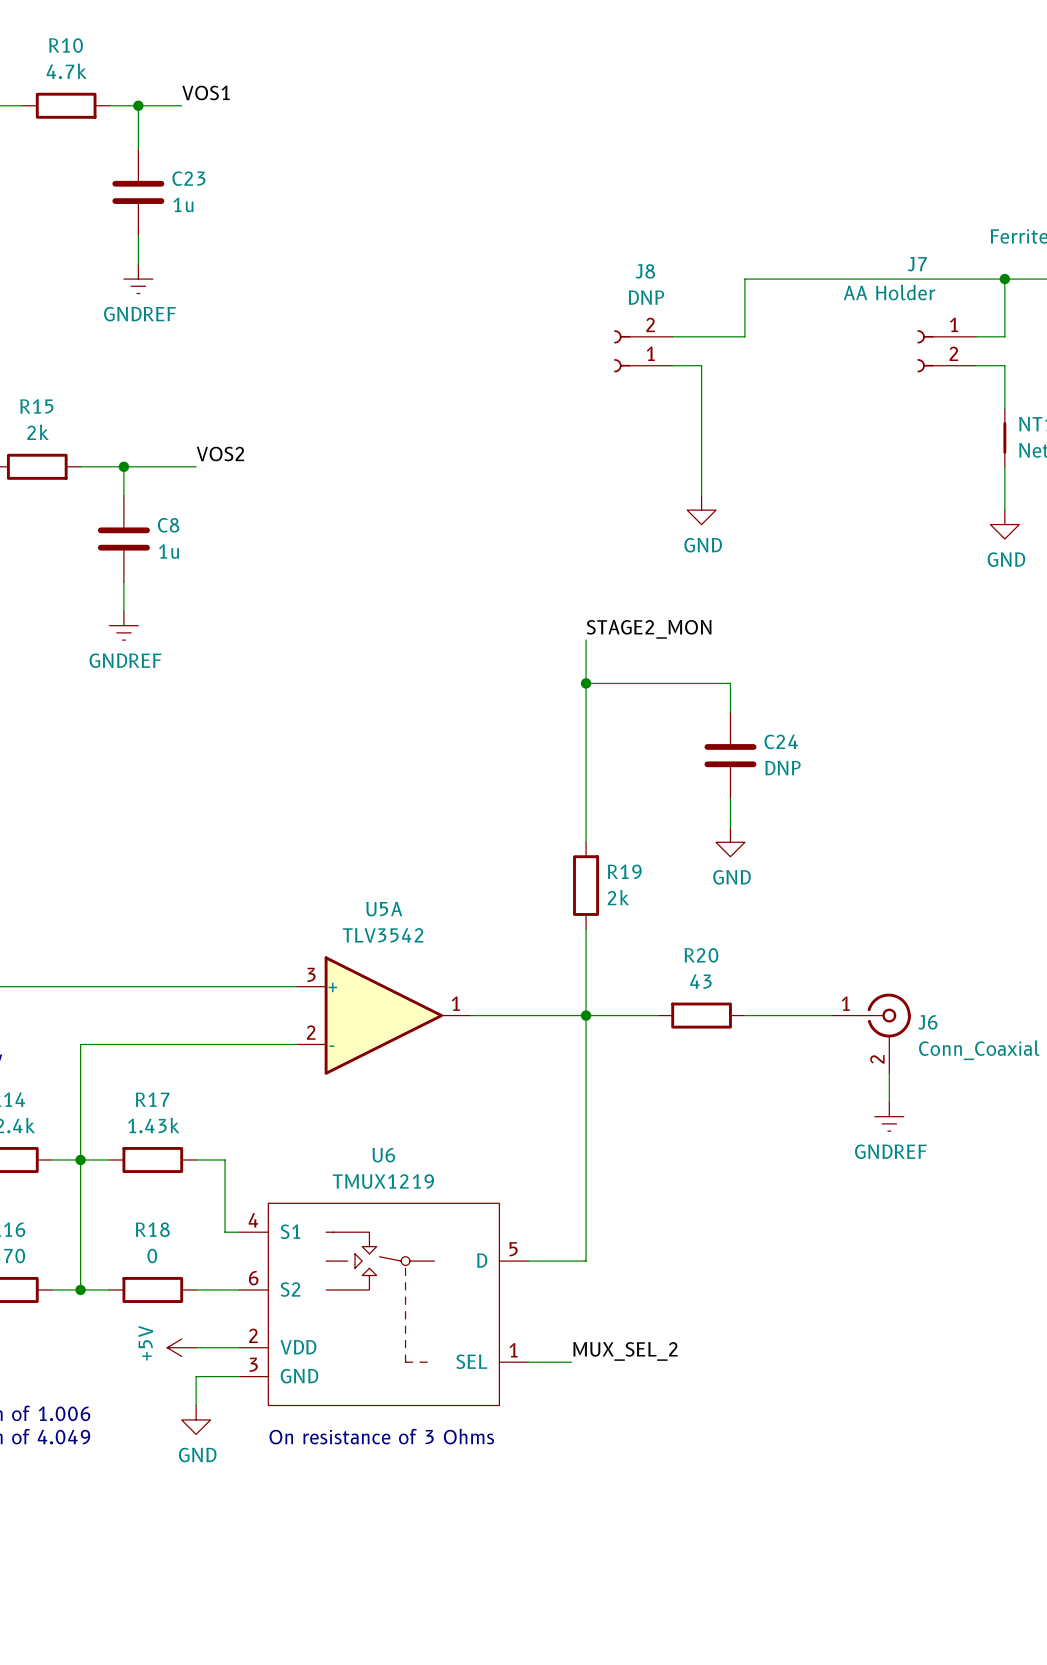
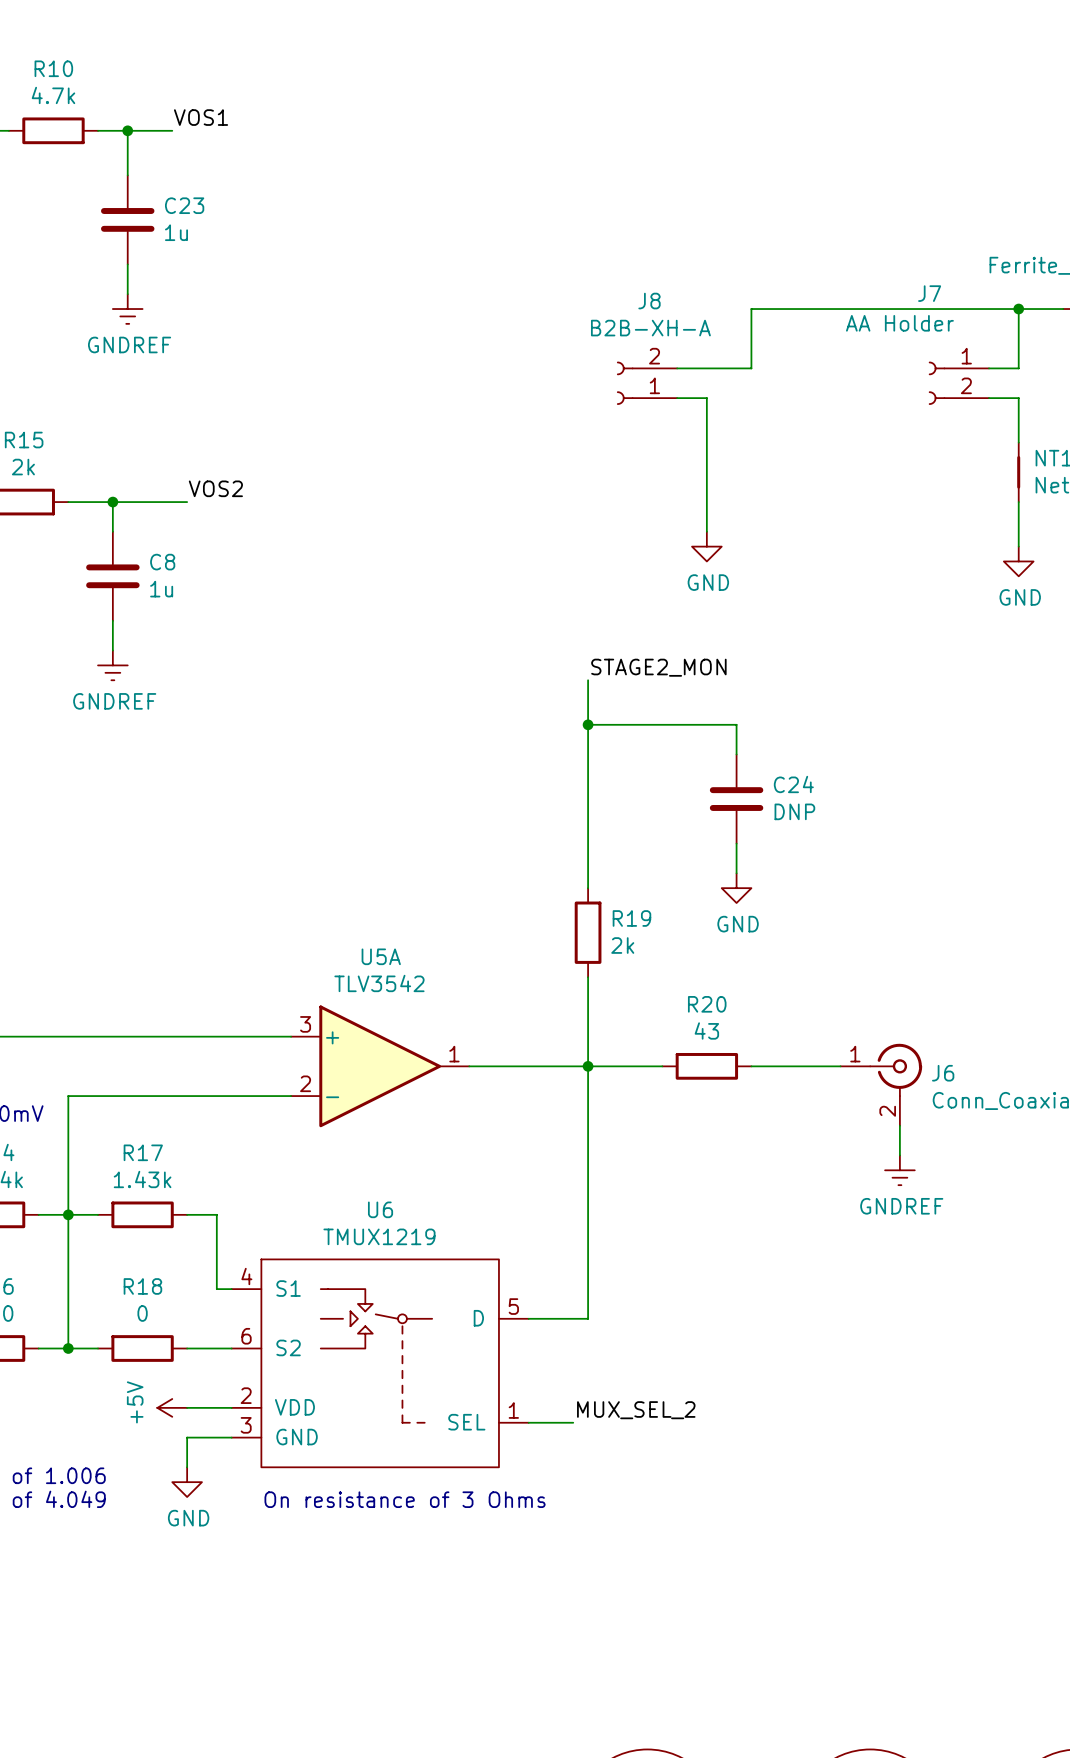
J8 value: DNP (646, 297) -> B2B-XH-A (650, 328)

